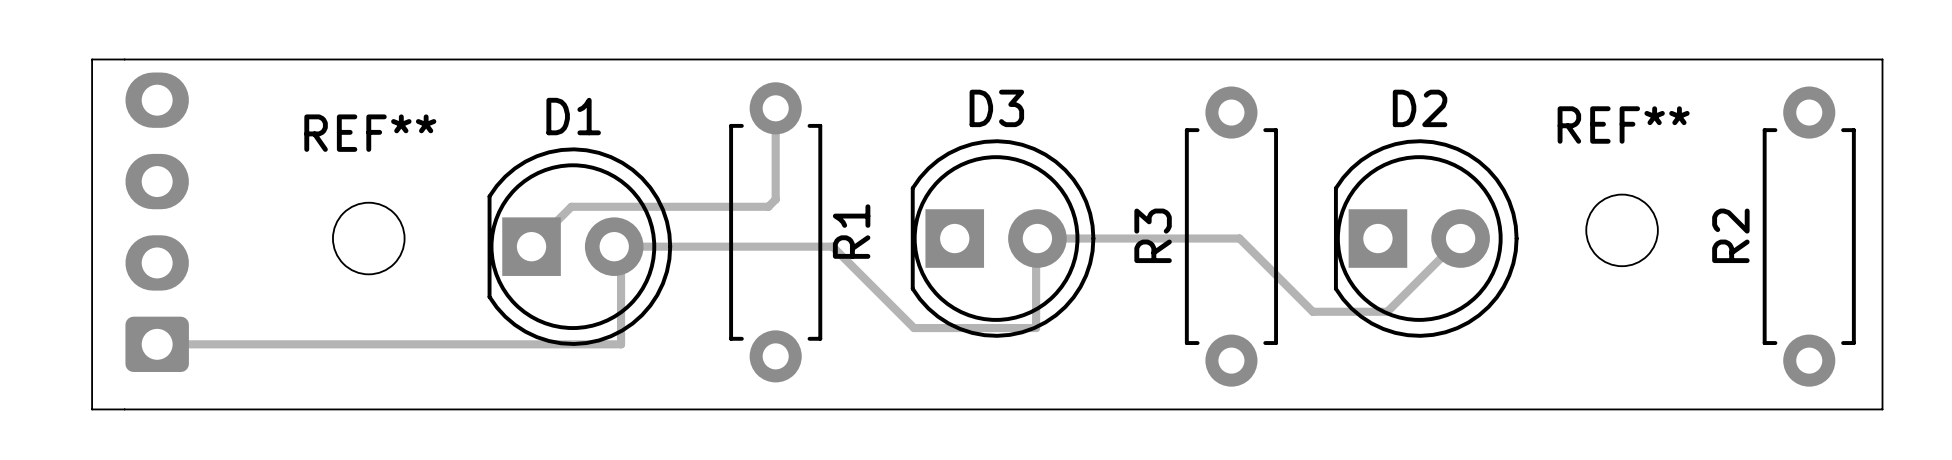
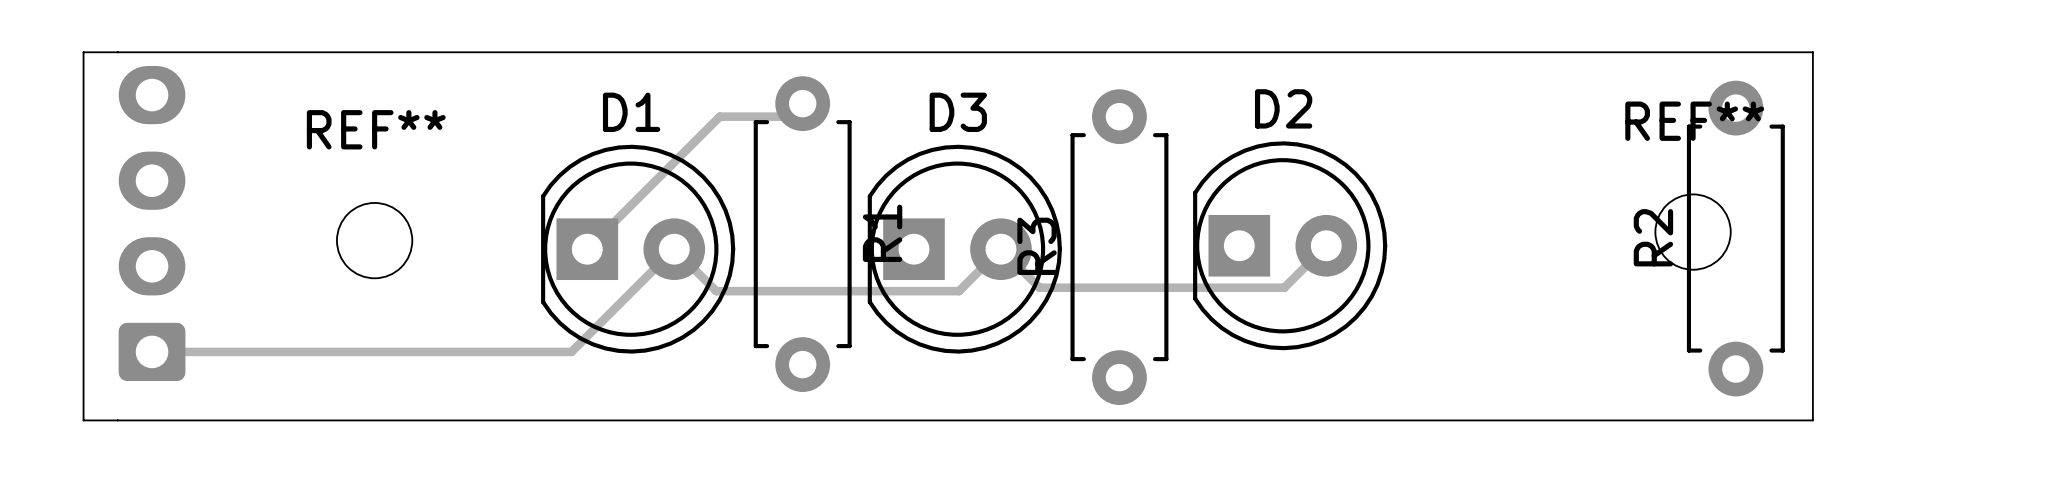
board edge: (1736, 59) (1882, 59) (1882, 409) (1736, 409) -> (1812, 52) (1812, 420)
track: (775, 108) (775, 199) (768, 206) (571, 206) (531, 246) -> none
track: none -> (794, 116) (719, 116) (587, 249)
R3 position: (1231, 236) -> (1119, 247)
R2 position: (1809, 236) -> (1735, 238)
D3 position: (1003, 238) -> (964, 249)
D2 position: (1426, 238) -> (1290, 245)
track: (1460, 238) (1387, 311) (1312, 311) (1239, 238) (1037, 238) (1036, 328) (914, 328) (832, 246) (614, 246) (621, 253) (621, 344) (555, 344) -> (1326, 245) (1284, 287) (1039, 287) (1000, 249) (959, 291) (716, 291) (674, 249) (571, 351)
D1 position: (579, 246) -> (638, 249)

